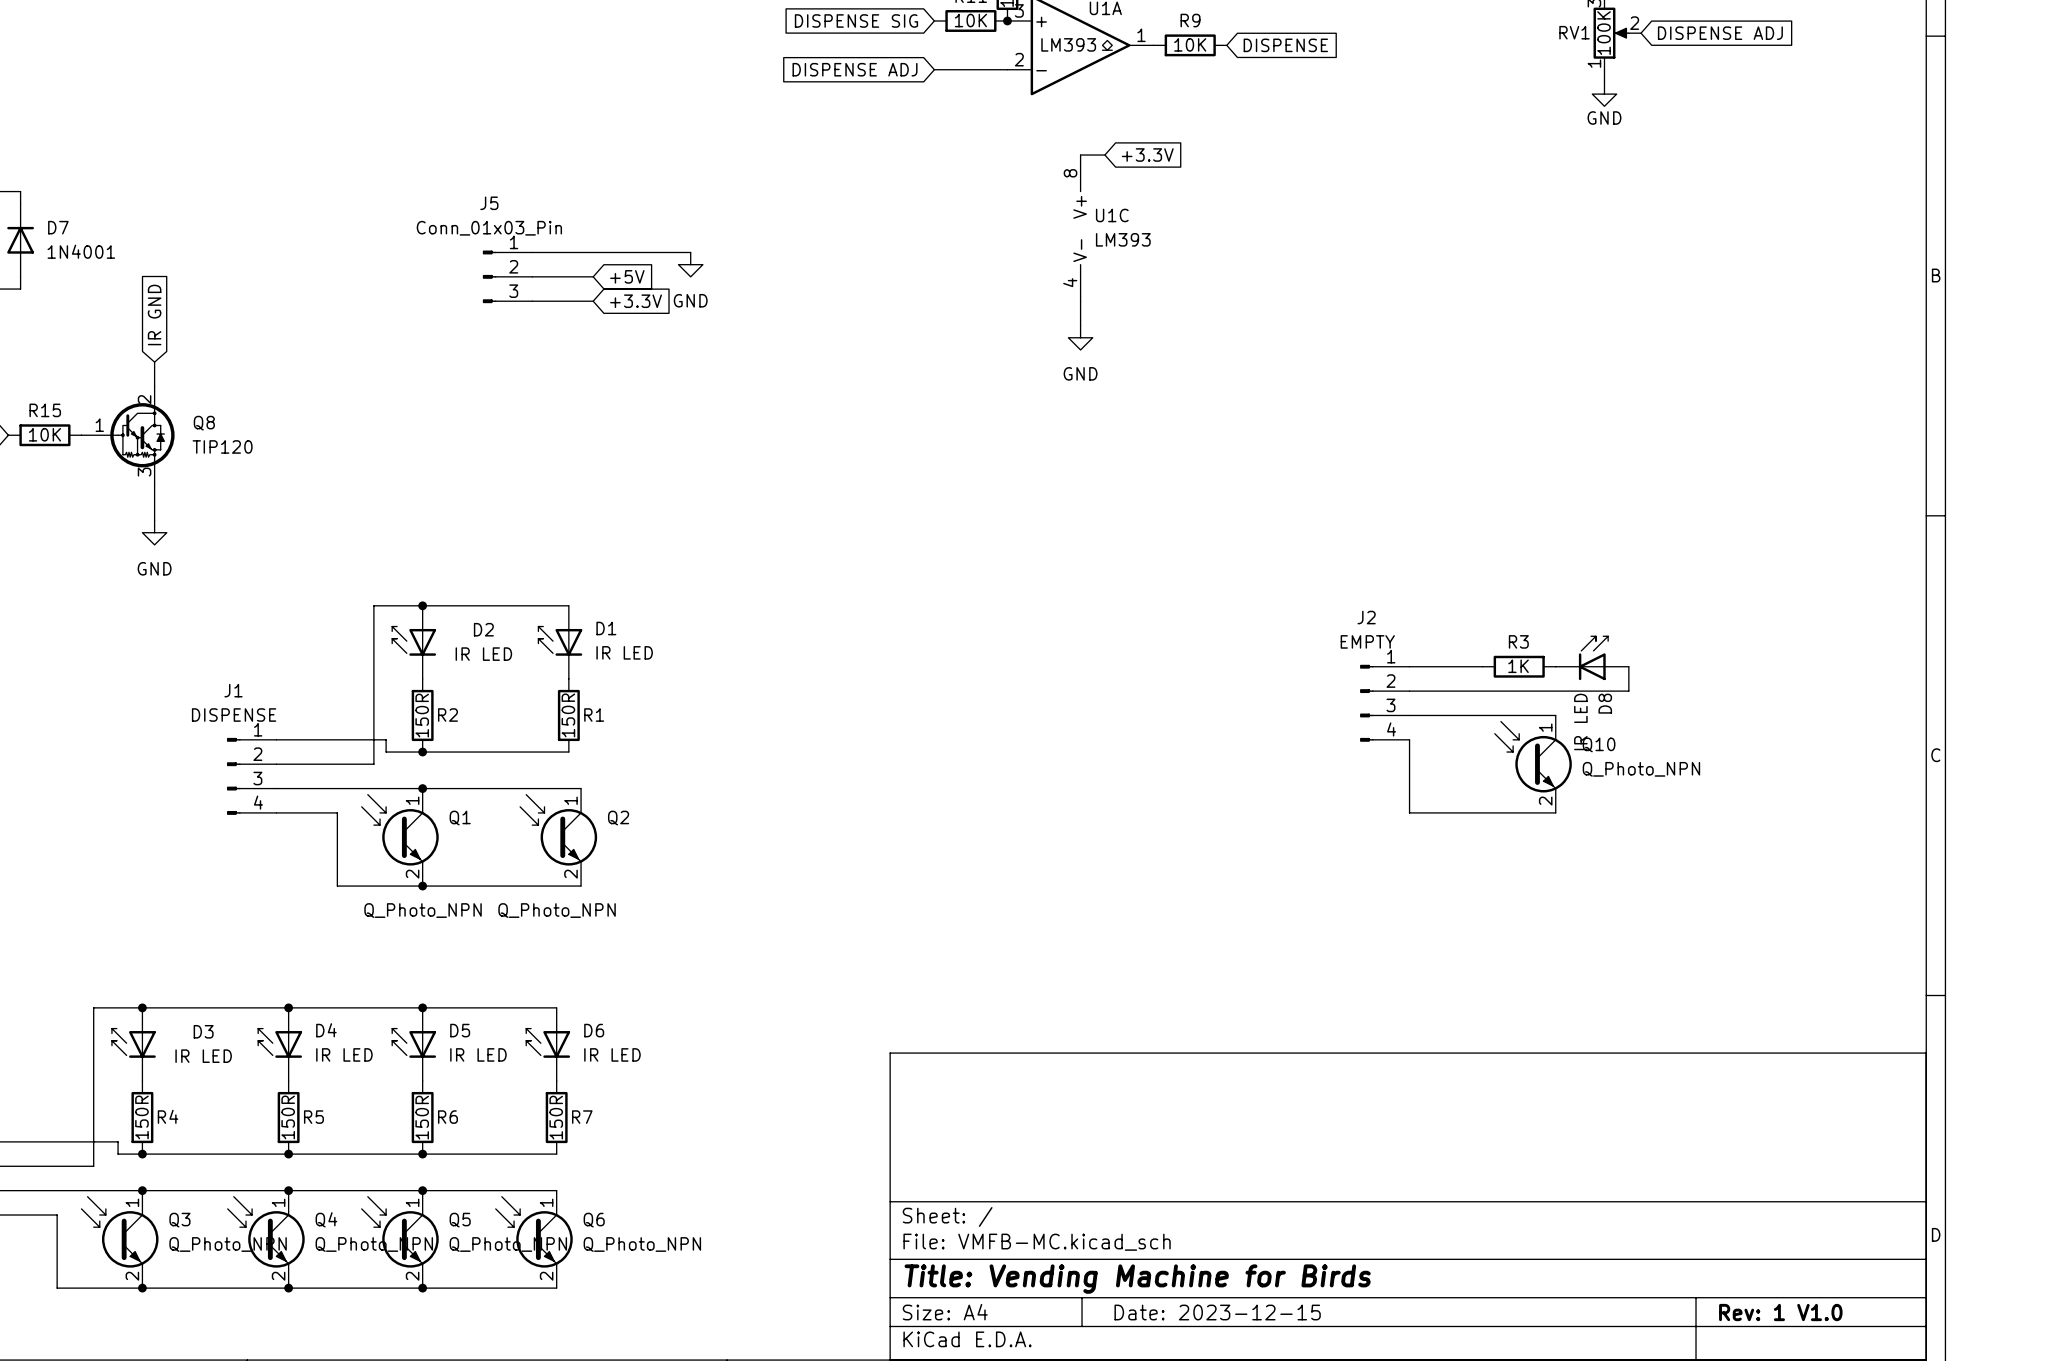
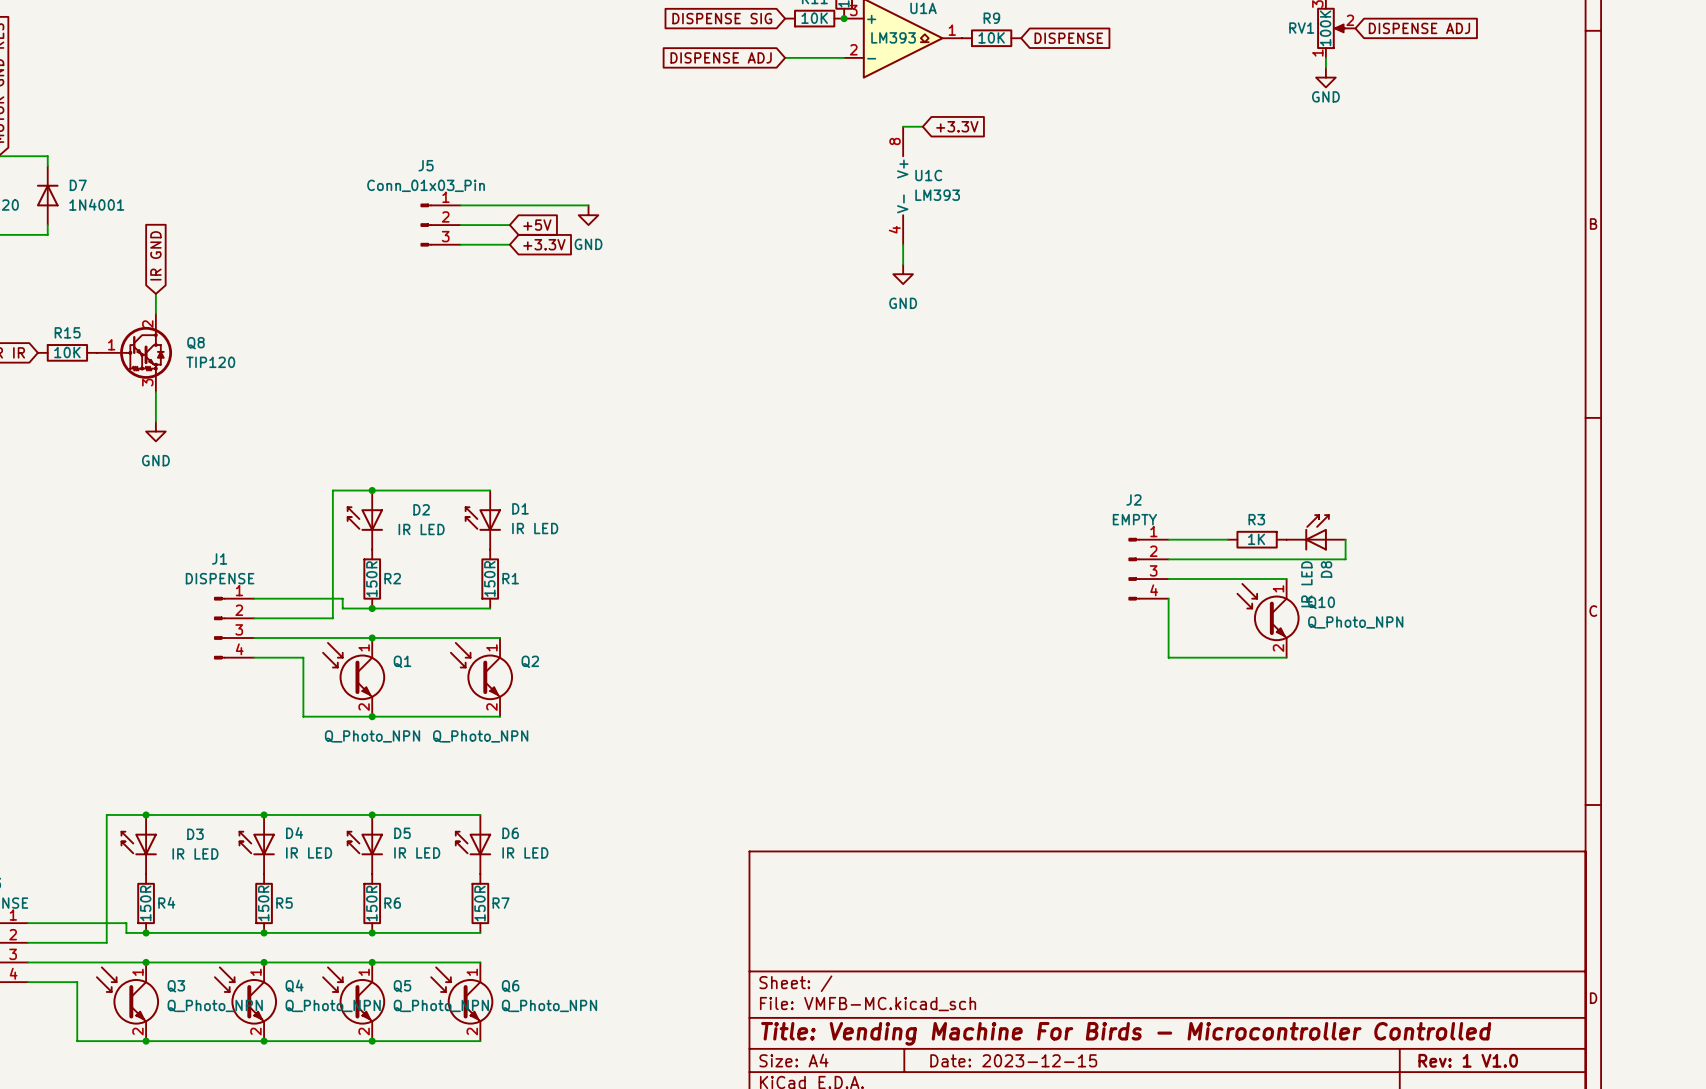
title block: Title: Vending Machine for Birds (1137, 1279) -> Title: Vending Machine For Birds - Microcontroller Controlled (1126, 1033)

